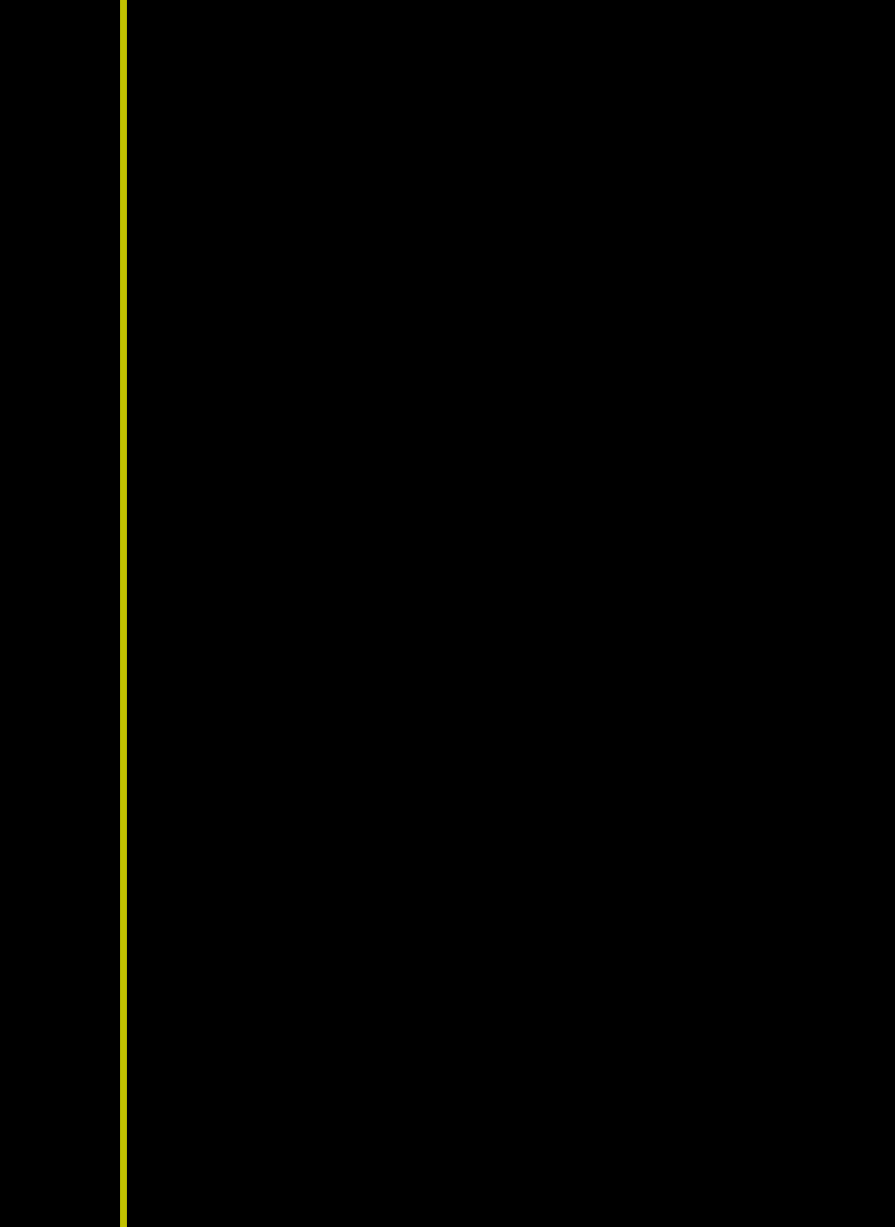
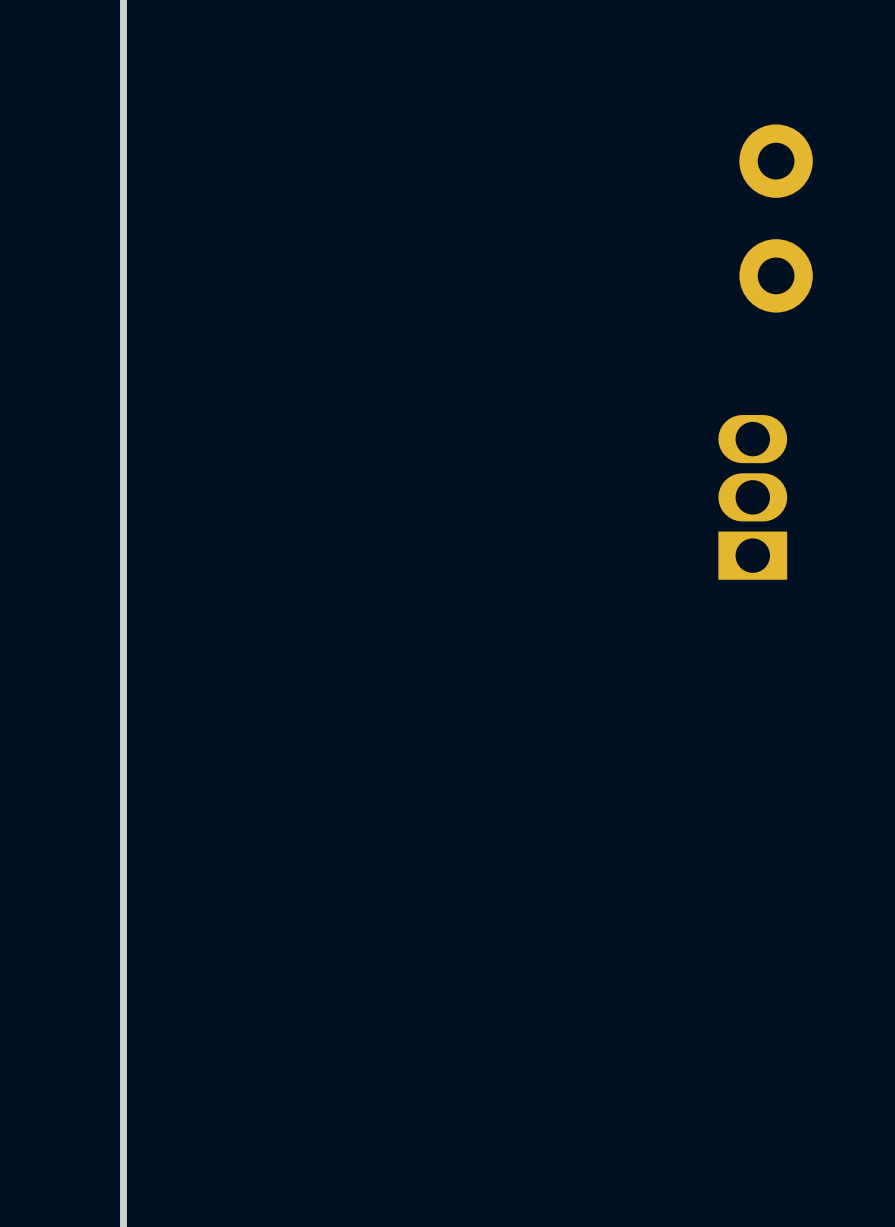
part: none -> (776, 218)
part: none -> (752, 497)

